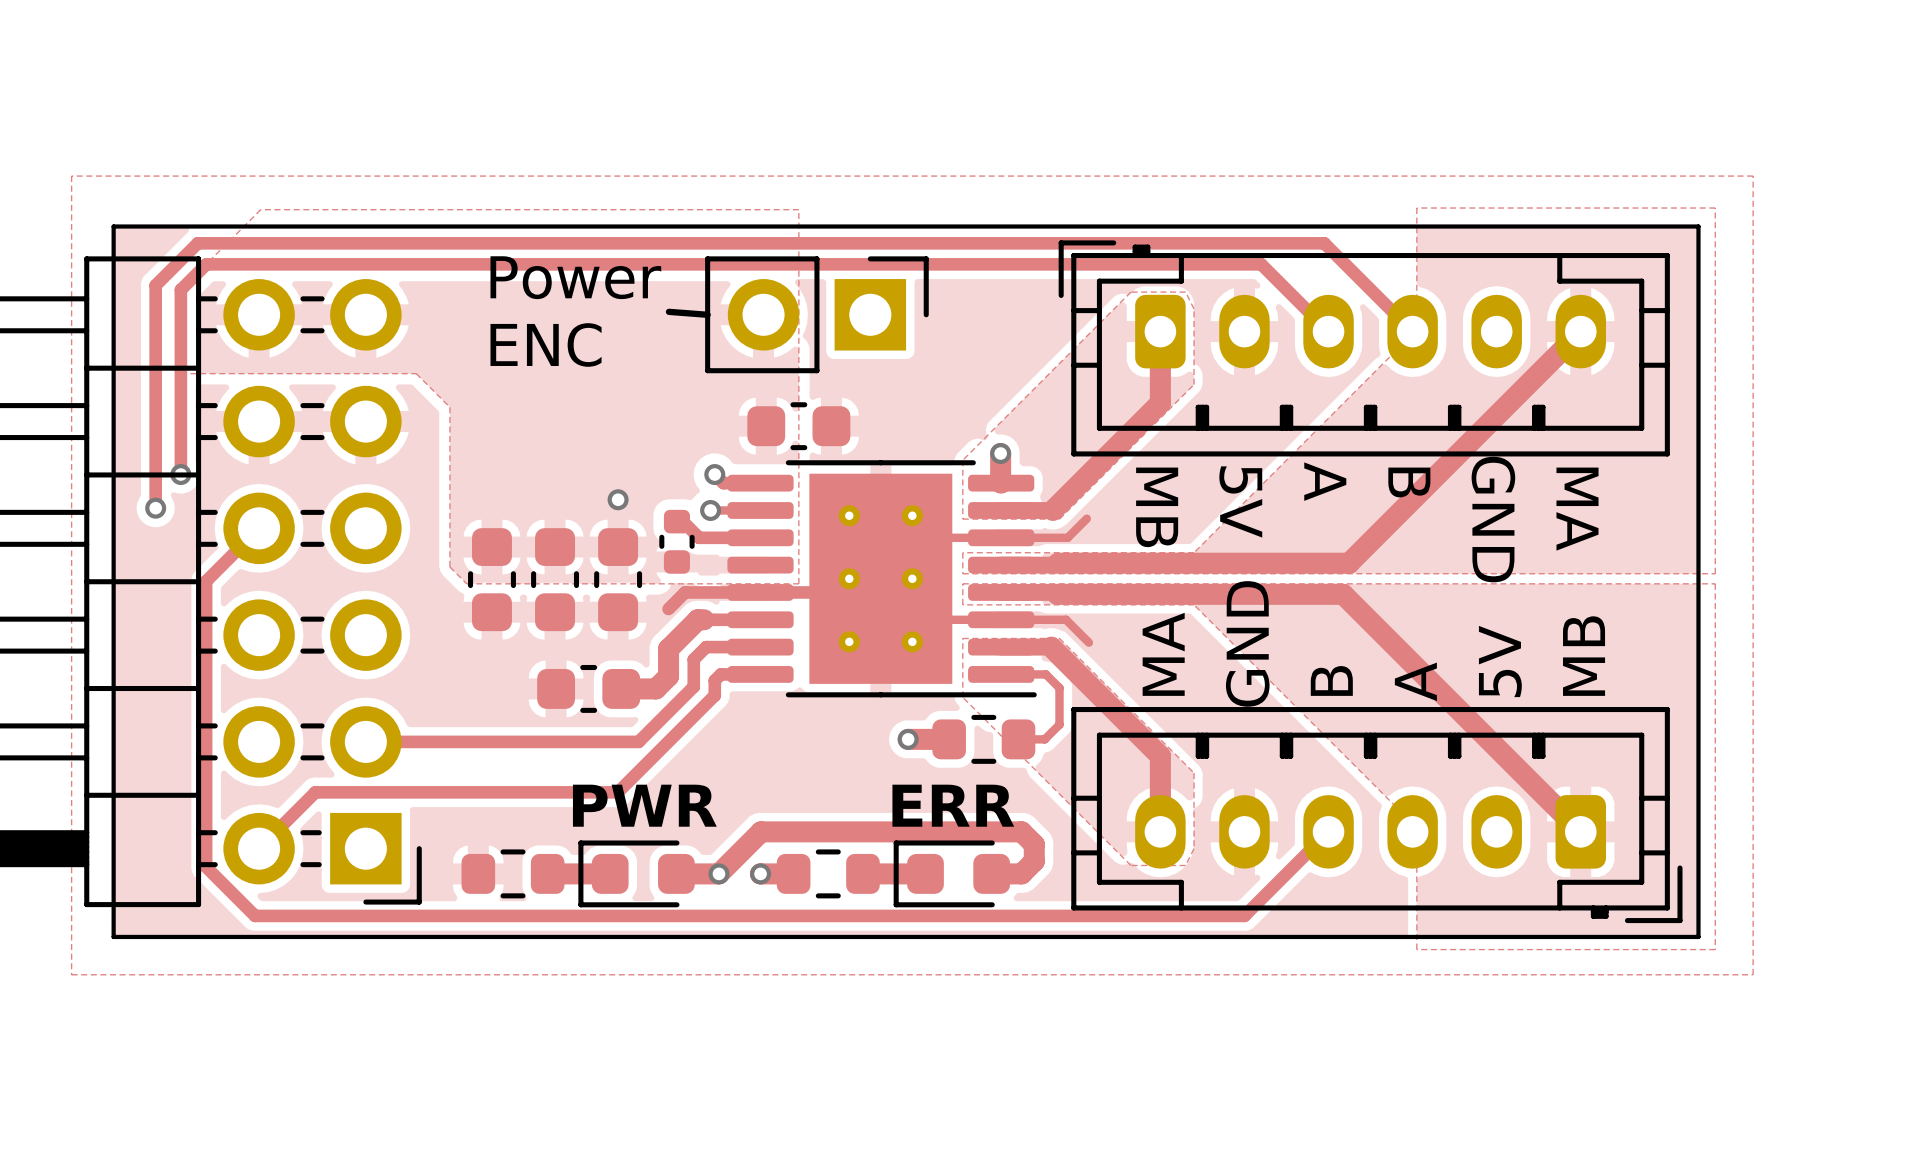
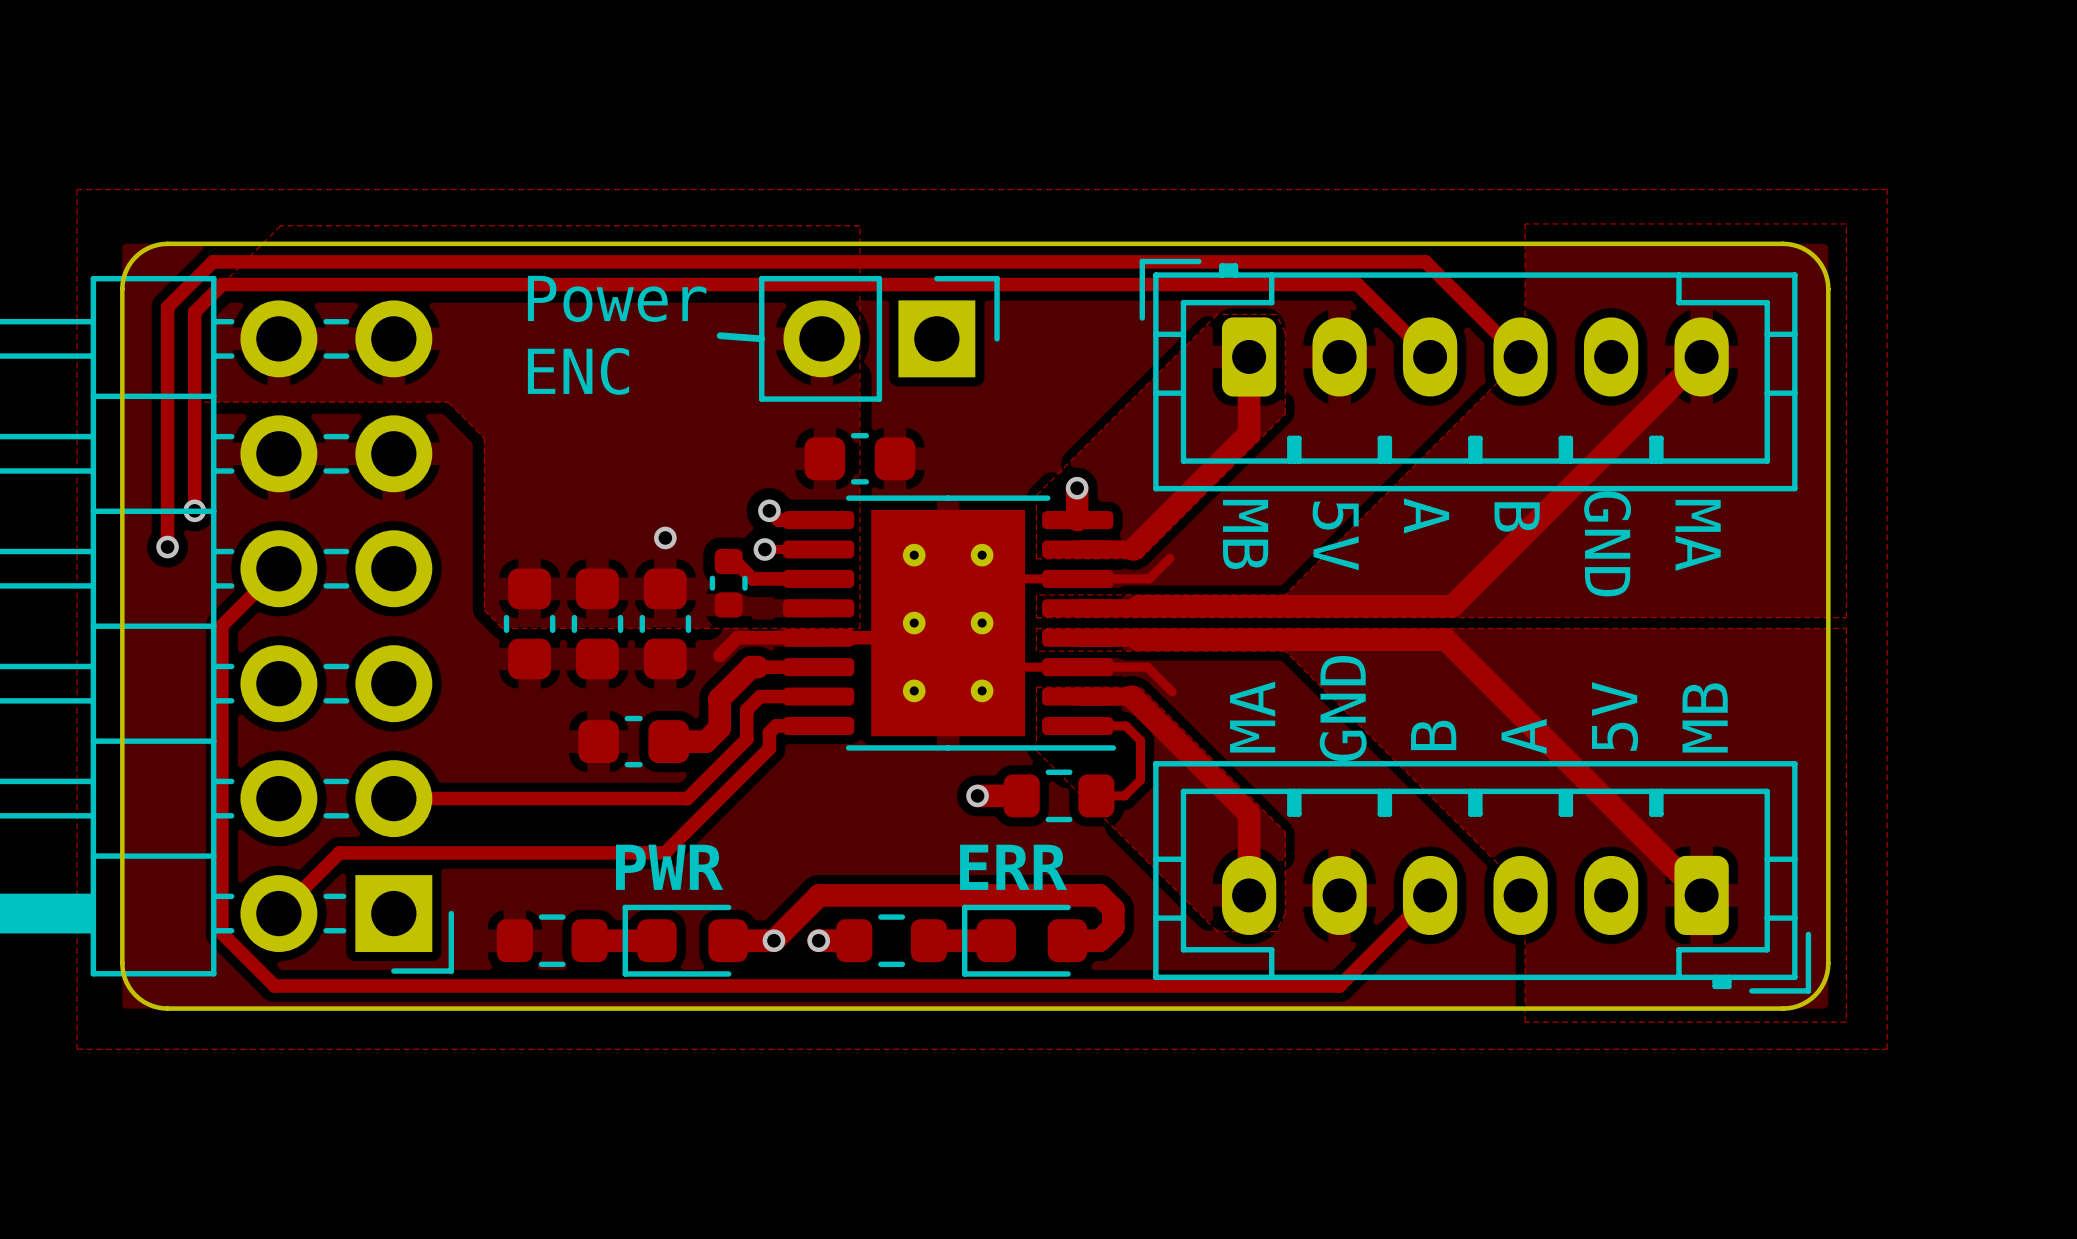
board edge: (155, 226) (113, 226) (113, 268) -> (167, 243) (152, 246) (135, 257) (124, 274) (122, 289)
board edge: (1656, 226) (1698, 226) (1698, 268) -> (1783, 243) (1802, 248) (1815, 257) (1825, 274) (1828, 289)
board edge: (113, 894) (113, 936) (155, 936) -> (122, 963) (124, 978) (135, 995) (152, 1006) (167, 1008)
board edge: (1698, 894) (1698, 936) (1656, 936) -> (1828, 963) (1823, 982) (1815, 995) (1802, 1004) (1783, 1008)

